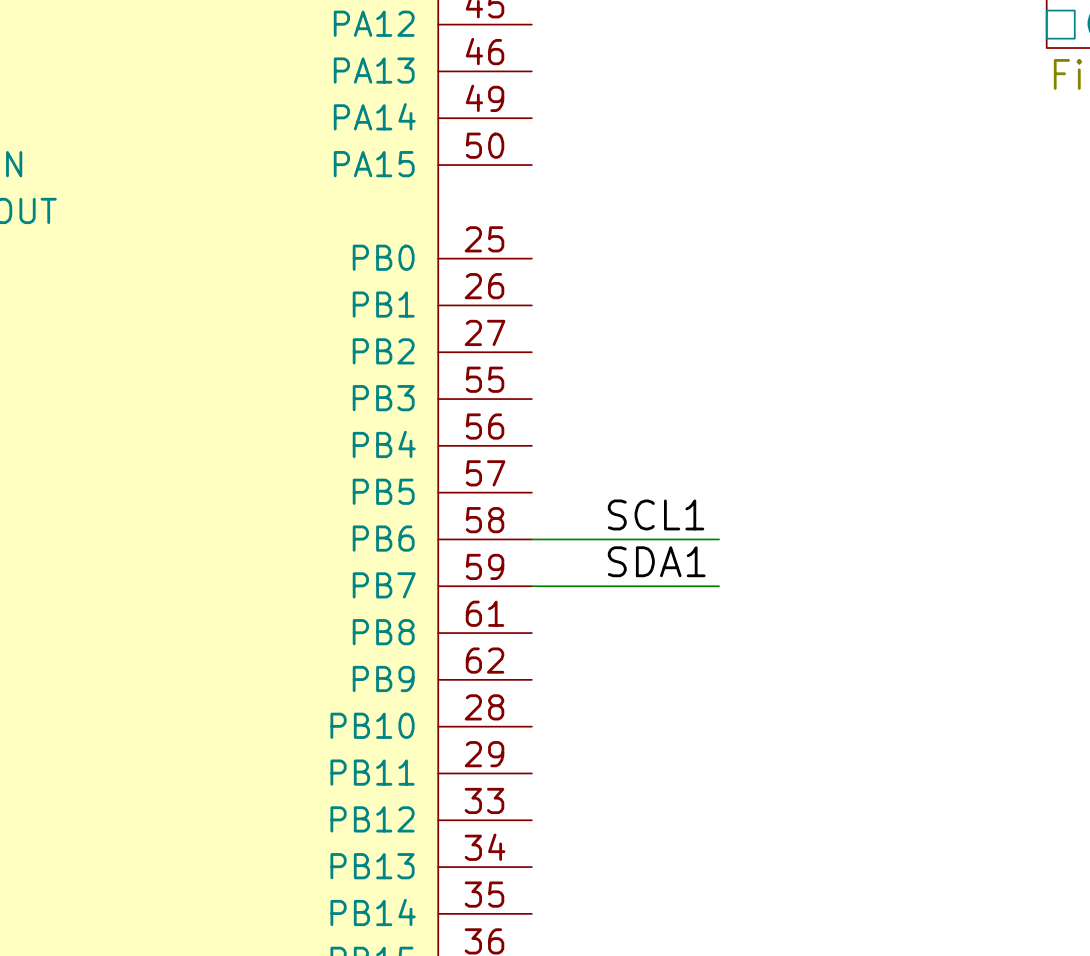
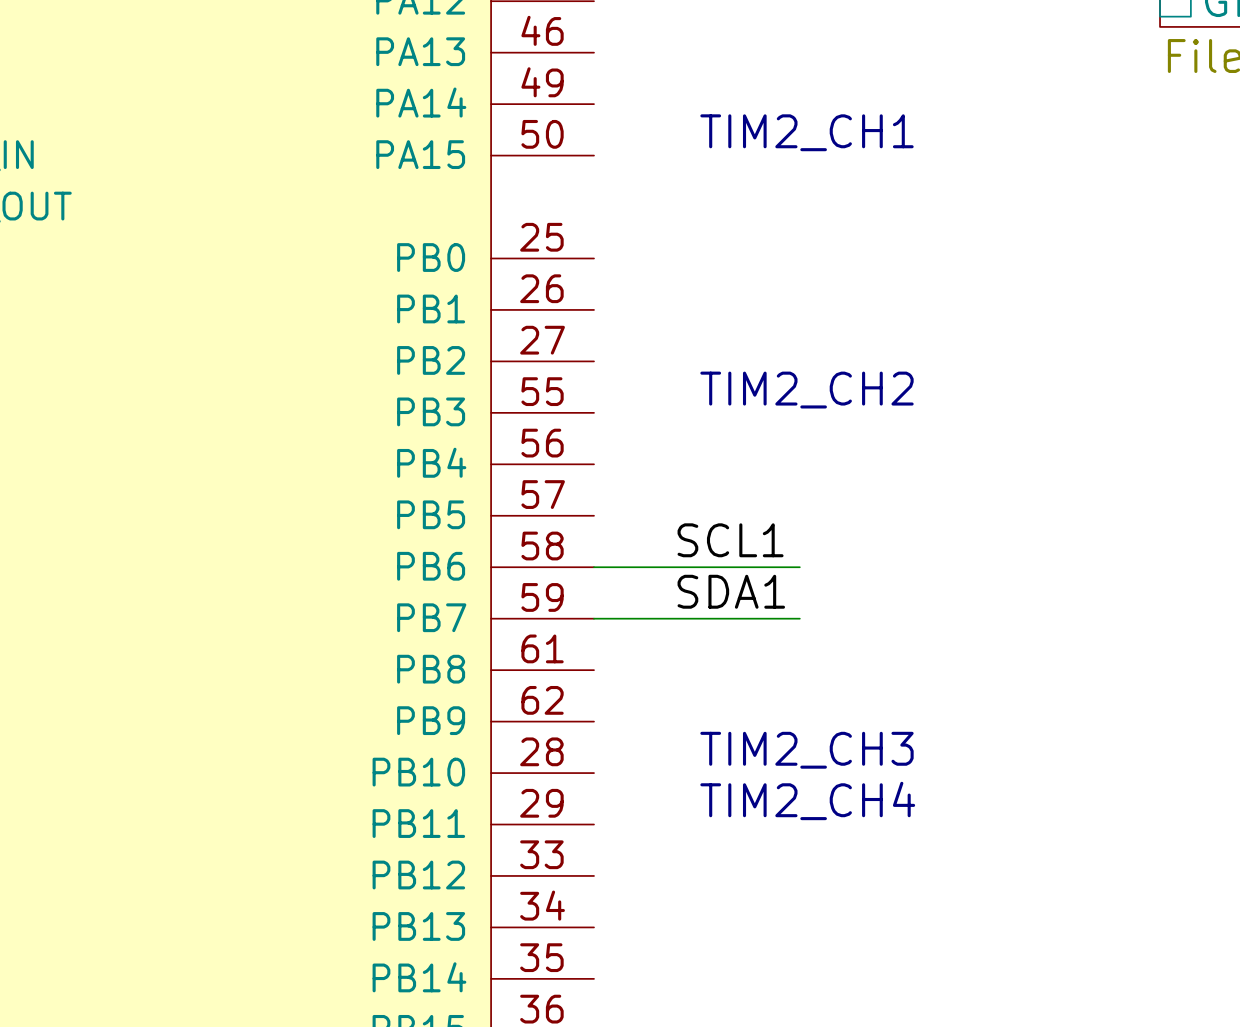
text: none -> TIM2_CH1 (806, 132)
text: none -> TIM2_CH2 (806, 390)
text: none -> TIM2_CH3 (806, 750)
text: none -> TIM2_CH4 (807, 800)

